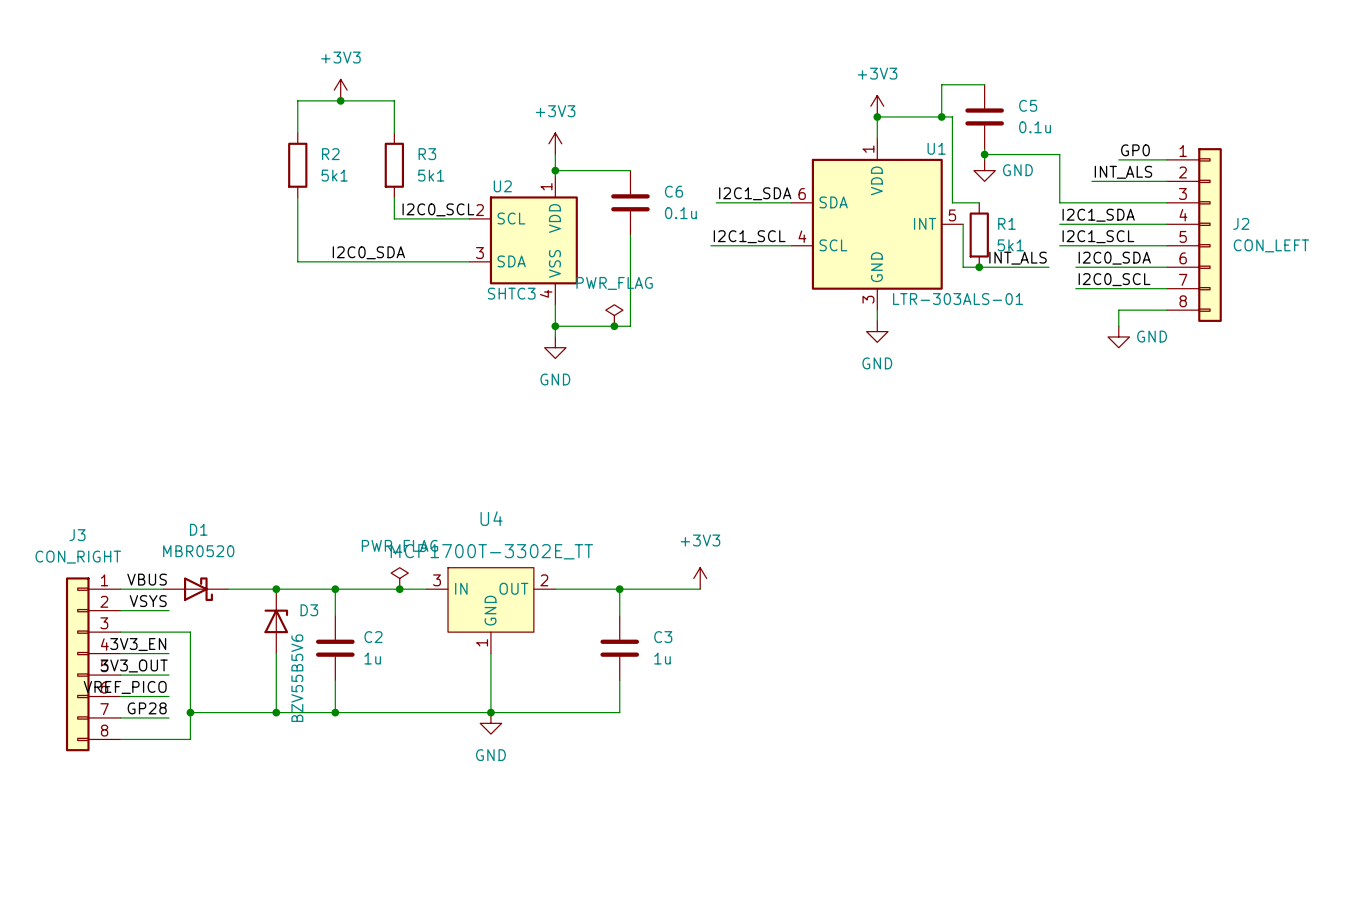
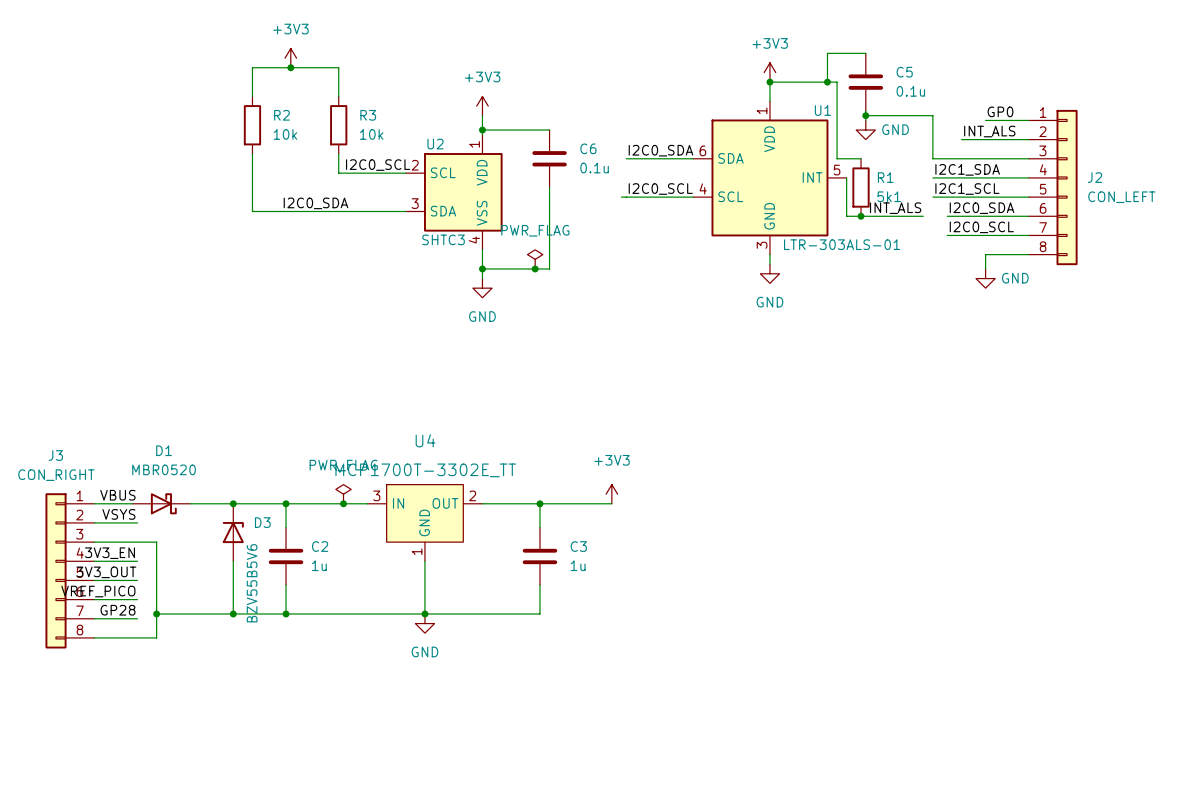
R2 value: 5k1 (334, 175) -> 10k (285, 134)
R3 value: 5k1 (431, 175) -> 10k (371, 134)
label: I2C1_SDA (755, 193) -> I2C0_SDA (660, 150)
label: I2C1_SCL (749, 236) -> I2C0_SCL (660, 189)

